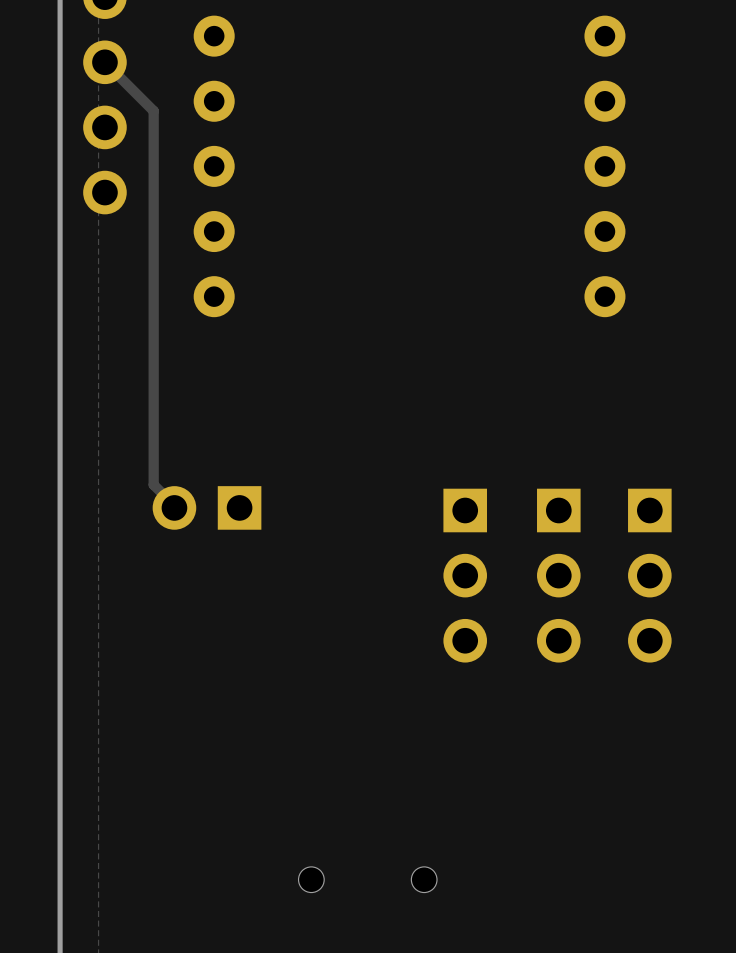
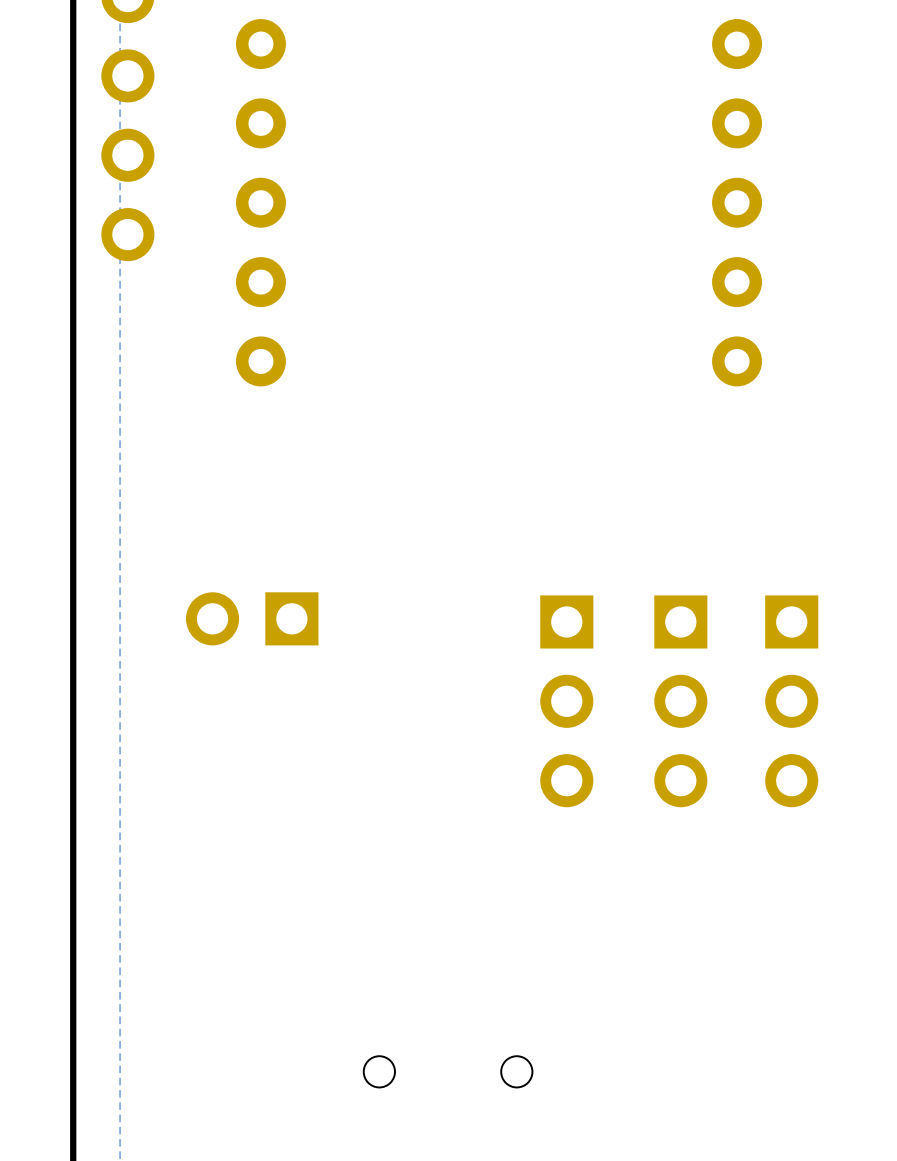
track: (104, 62) (153, 111) (153, 484) (174, 505) (174, 507) -> none

